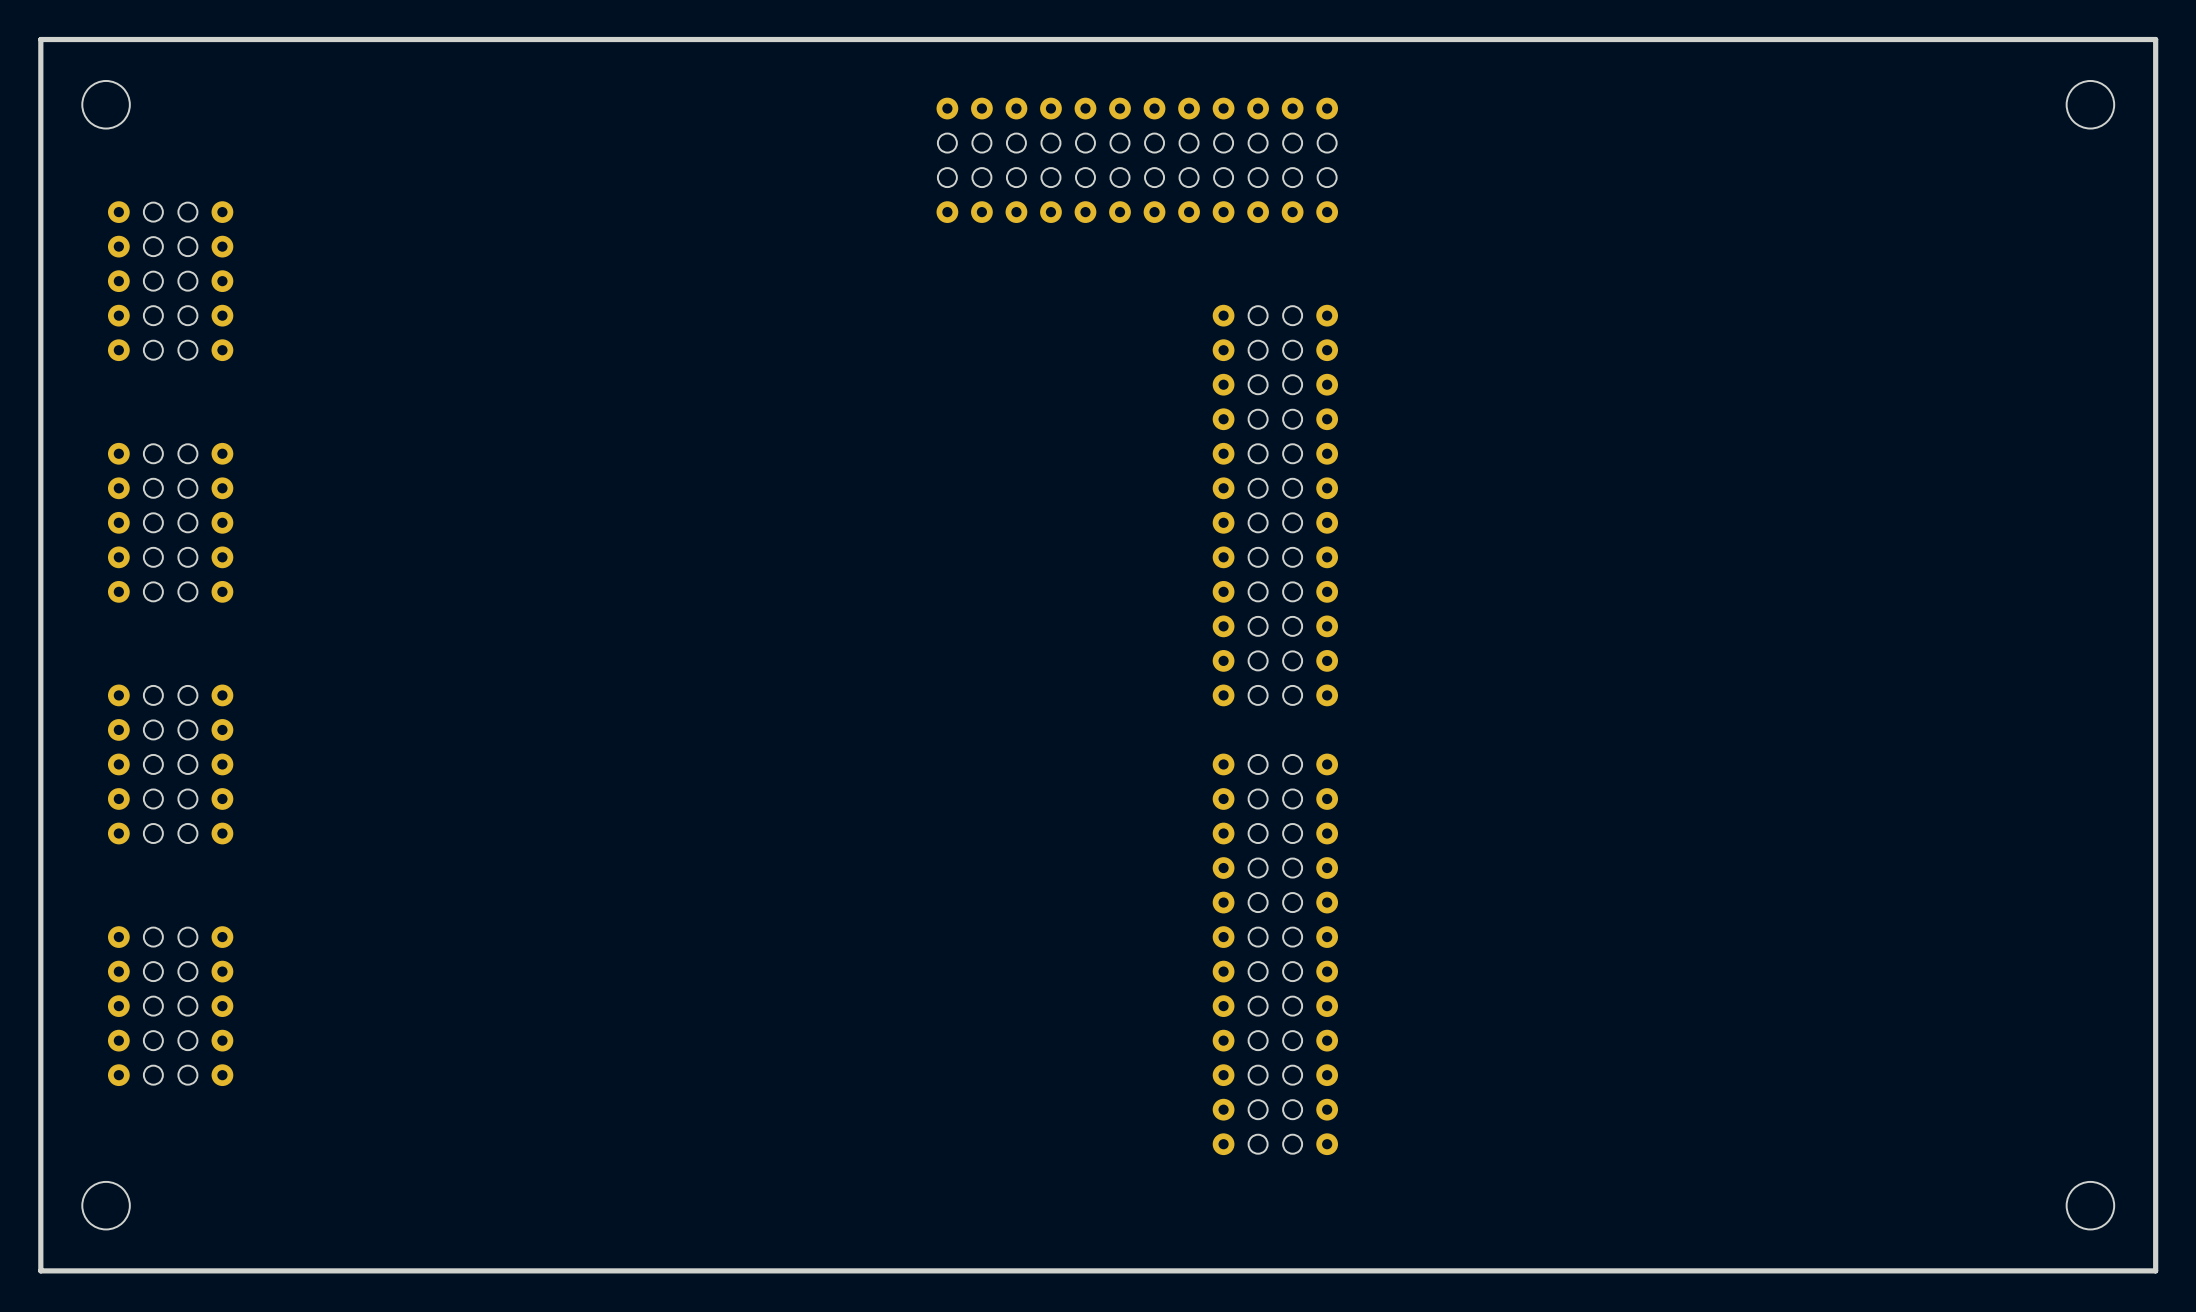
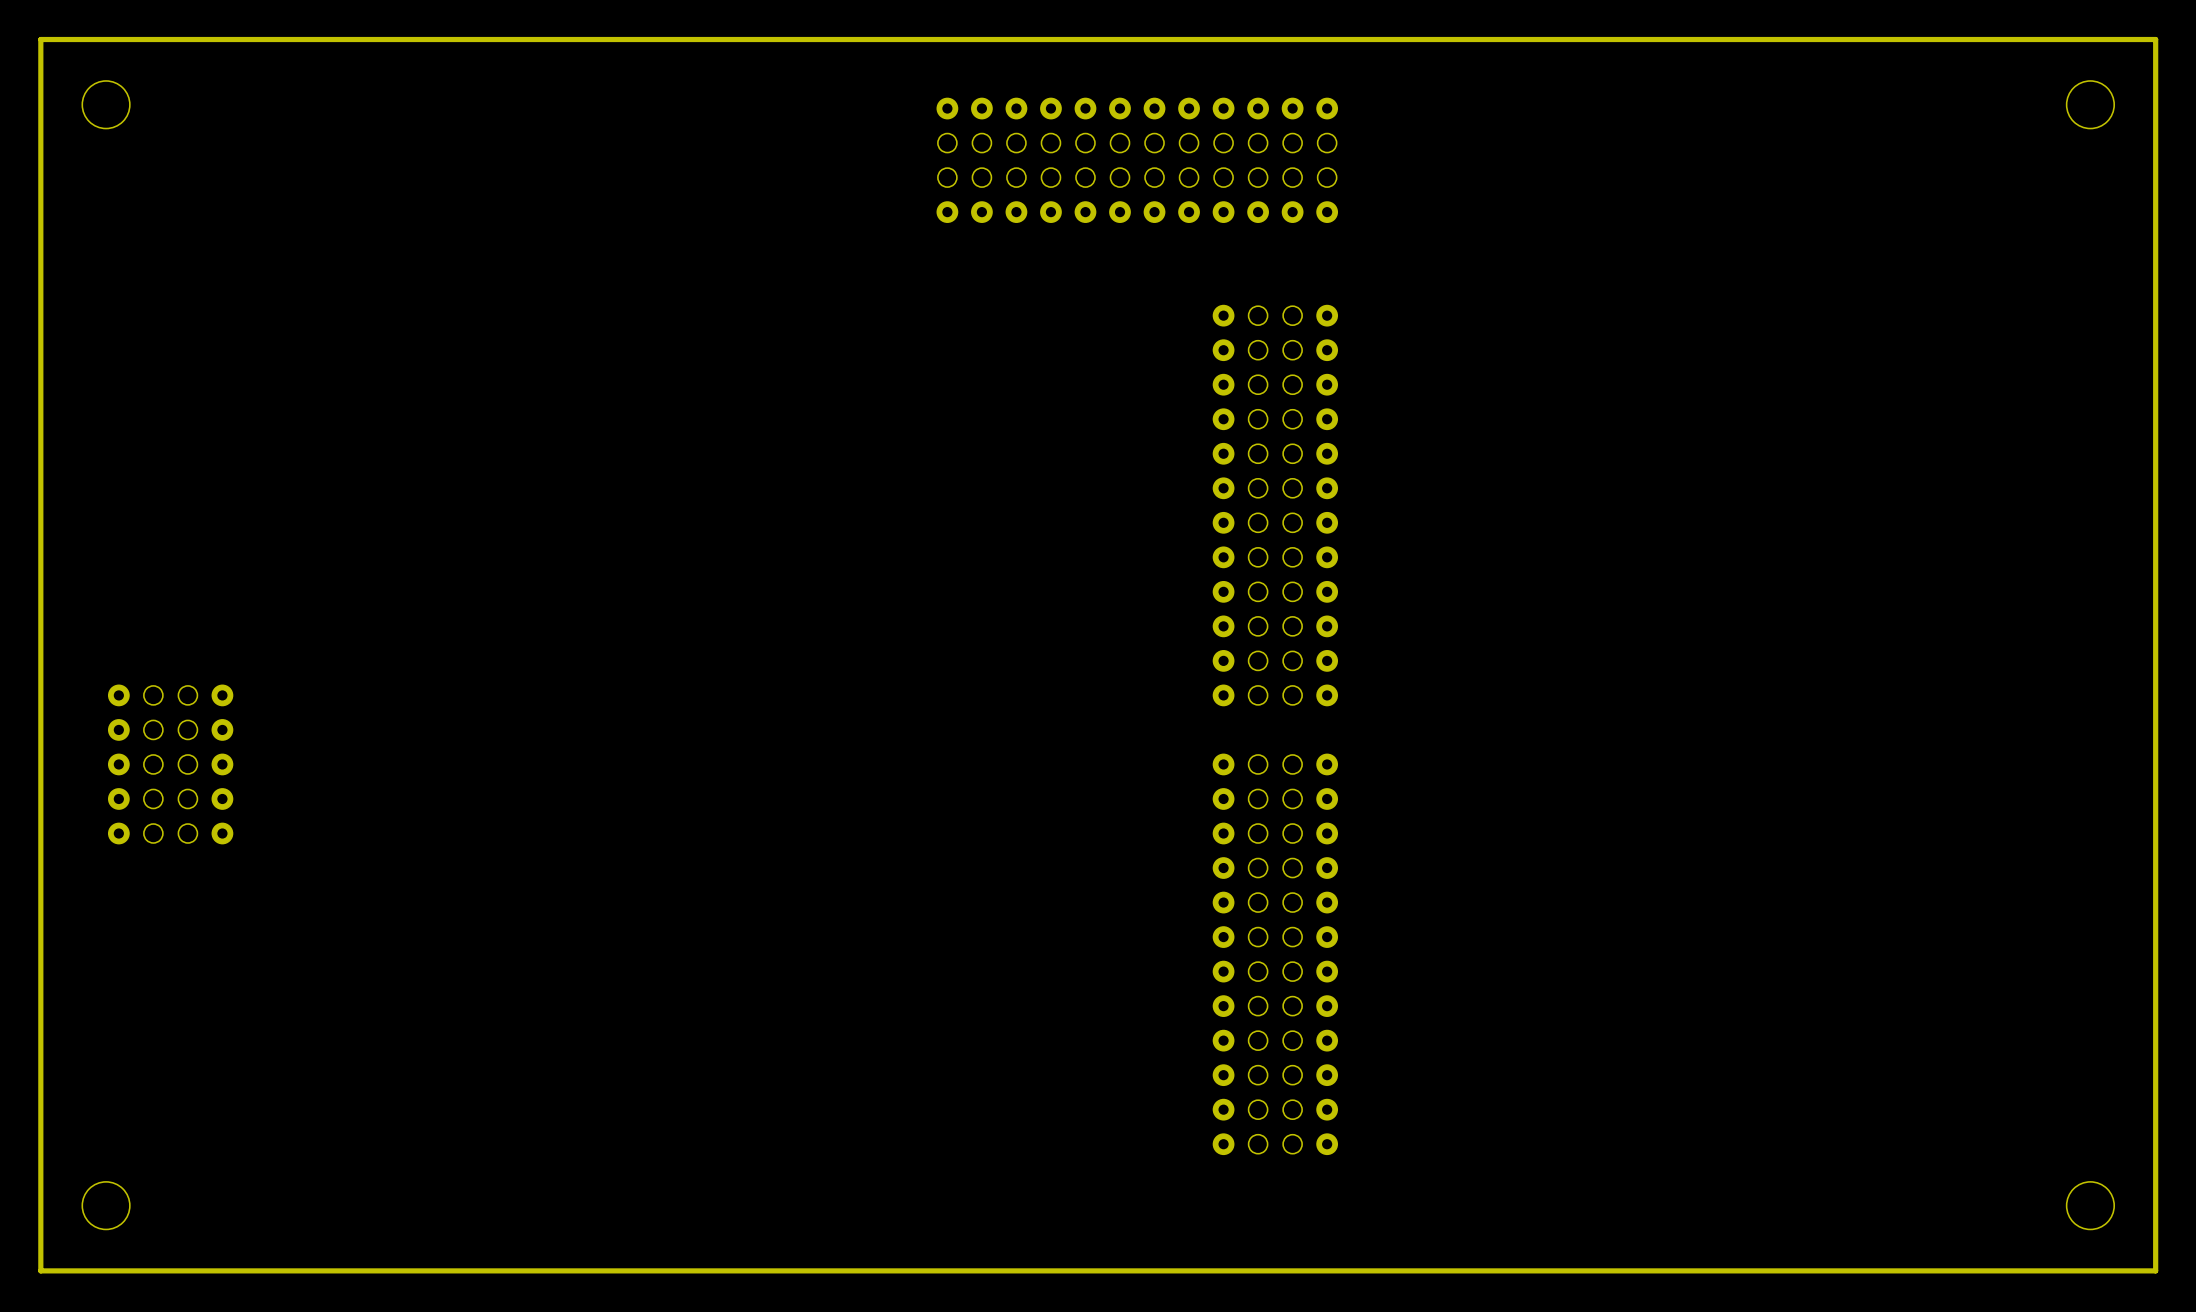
part: (170, 281) -> none
part: (170, 522) -> none
part: (170, 1006) -> none

